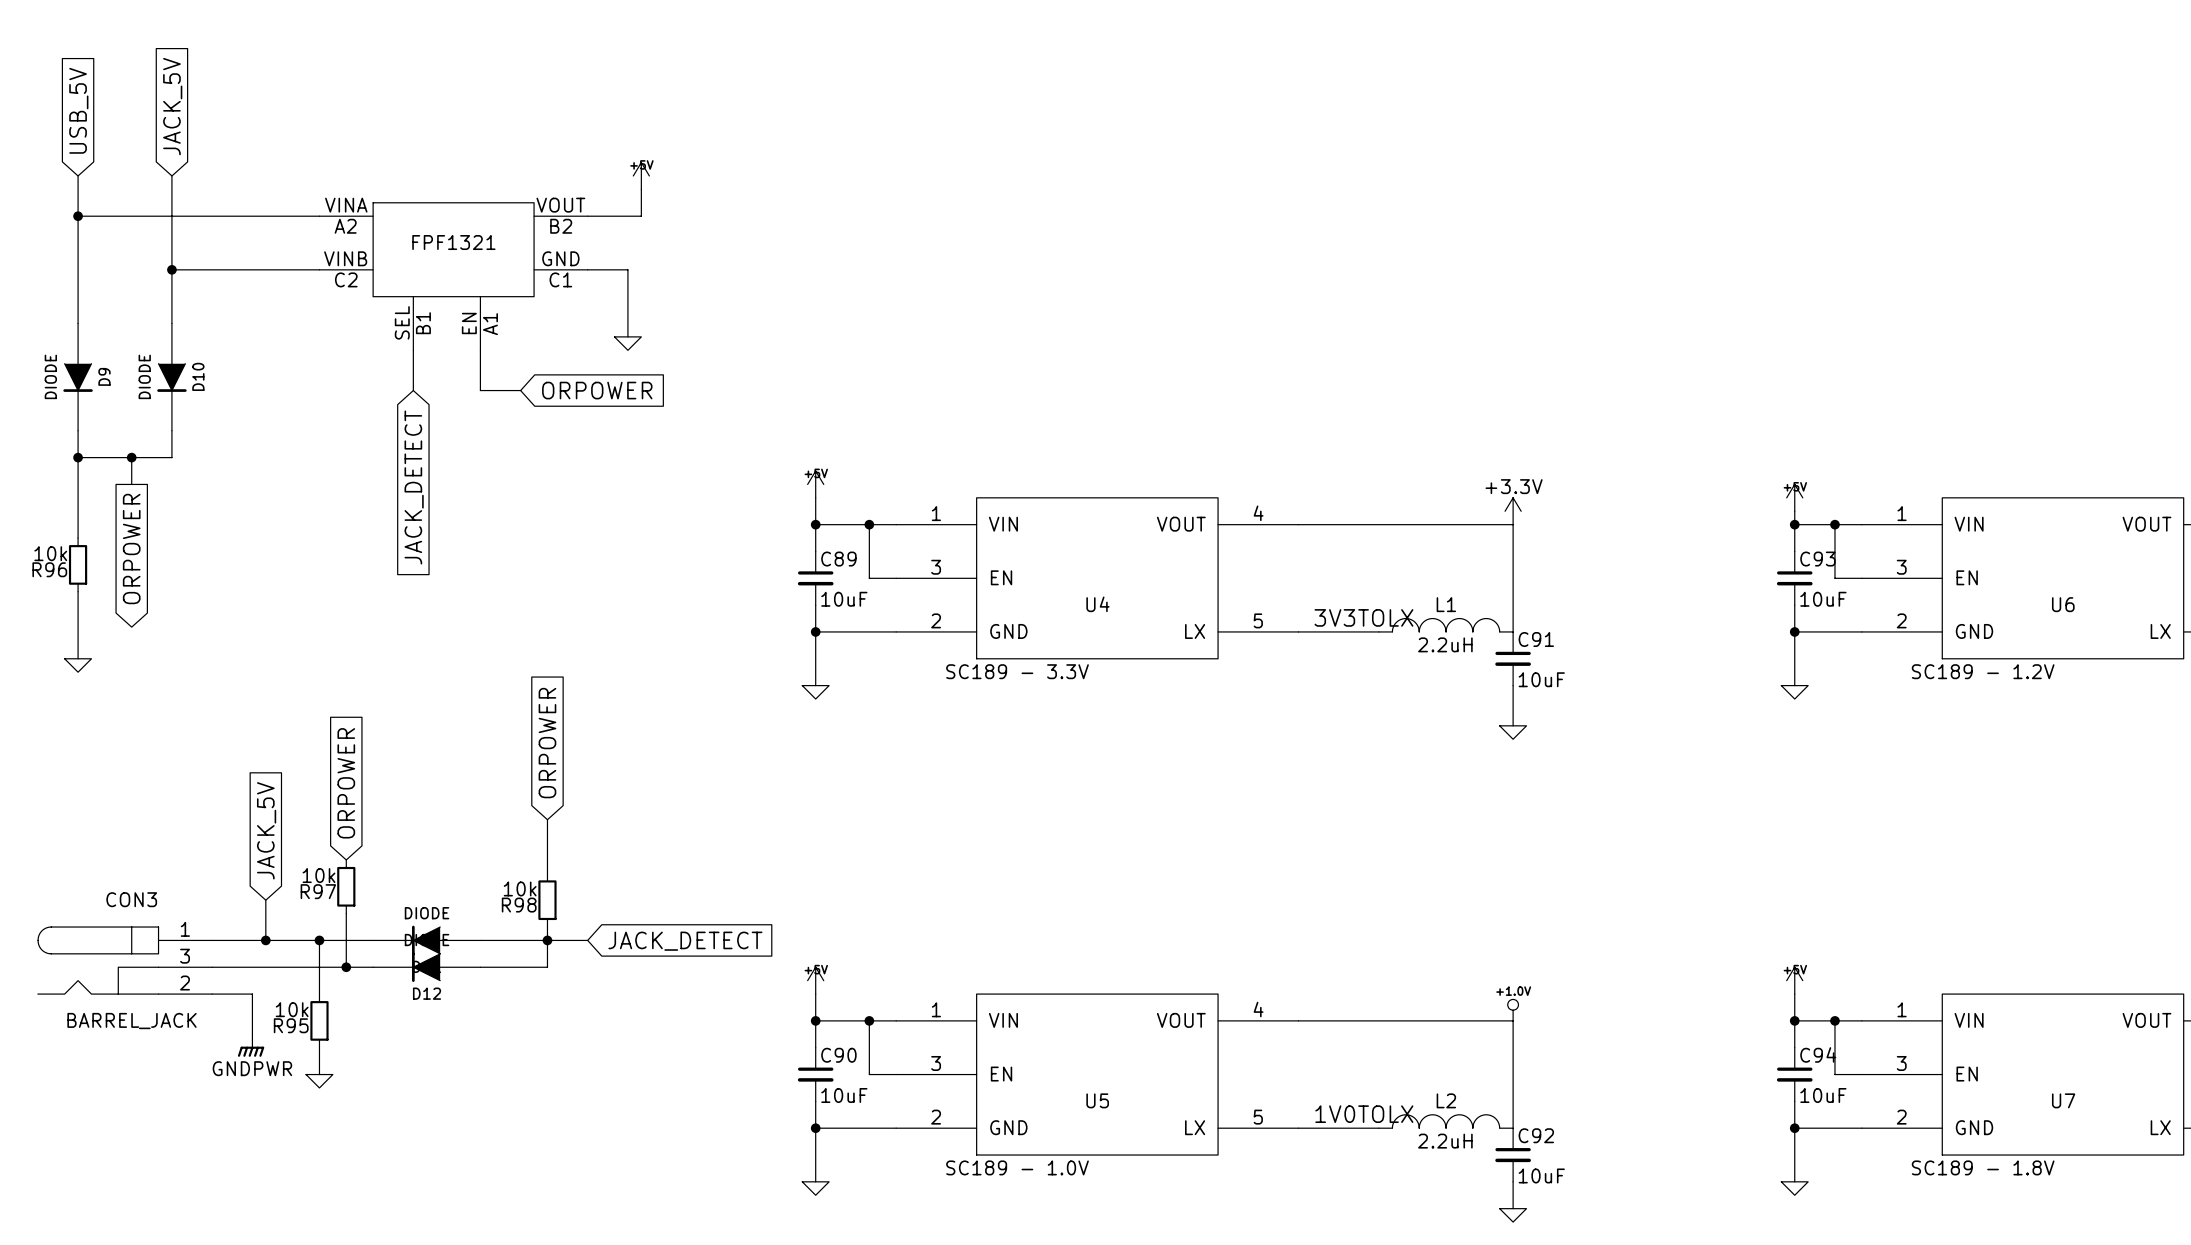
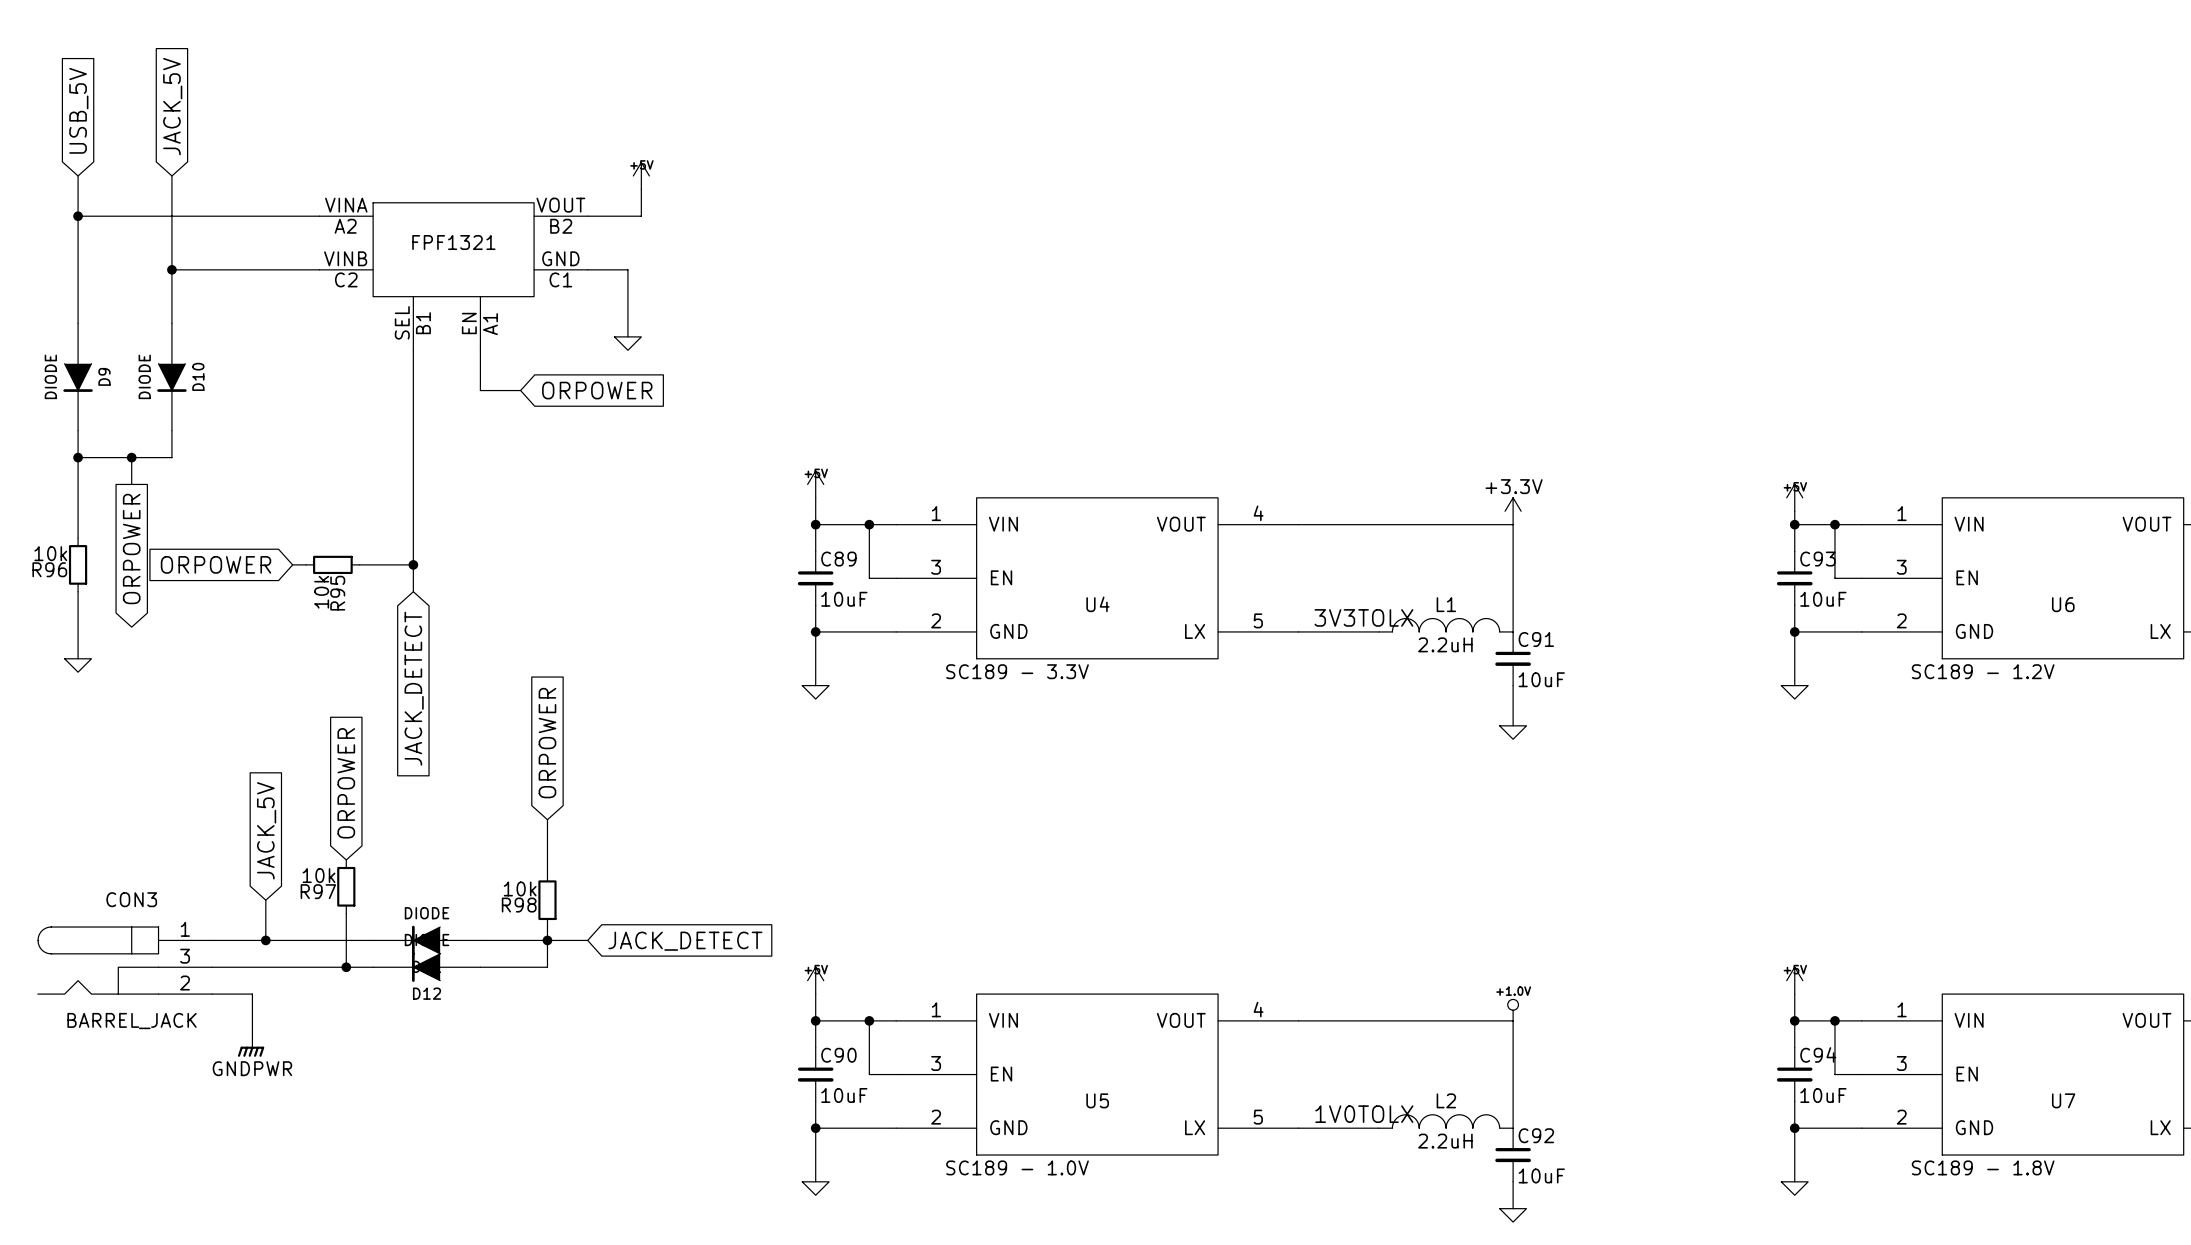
wire: none -> (413, 390) (413, 591)
global label position: JACK_DETECT (414, 487) -> JACK_DETECT (414, 688)
global label: none -> ORPOWER (216, 564)
wire: none -> (292, 564) (306, 564)
wire: none -> (359, 564) (413, 564)
junction: none -> (413, 564)
wire: (319, 940) (319, 994) -> none
junction: (319, 940) -> none
R95 value position: 10k (292, 1009) -> 10k (321, 592)
R95 rotation: 0° (319, 1020) -> 90° clockwise (332, 564)
R95 position: (319, 1020) -> (332, 564)
R95 name position: R95 (291, 1025) -> R95 (337, 593)
wire: (319, 1047) (319, 1074) -> none
power symbol: (319, 1081) -> none

